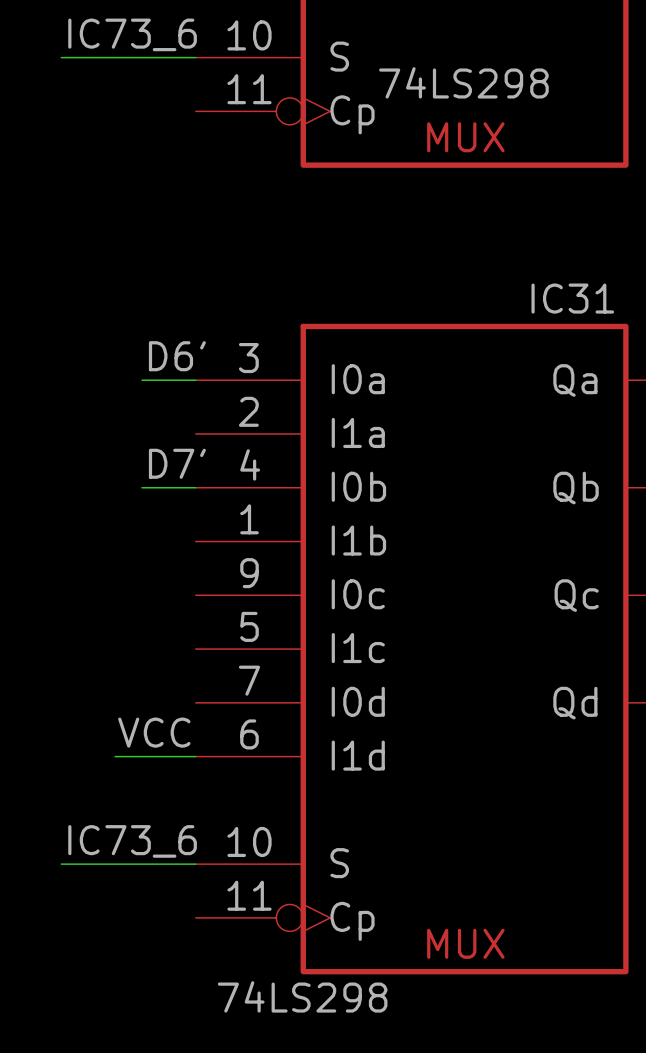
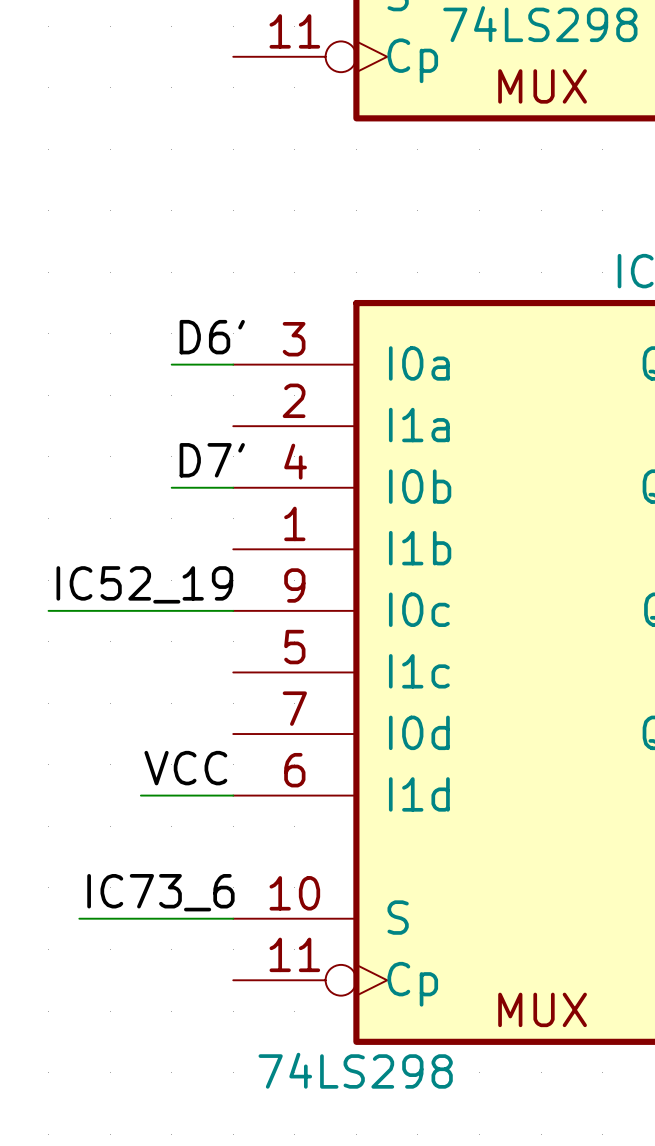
label: none -> IC52_19 (144, 584)
wire: none -> (48, 610) (233, 610)

